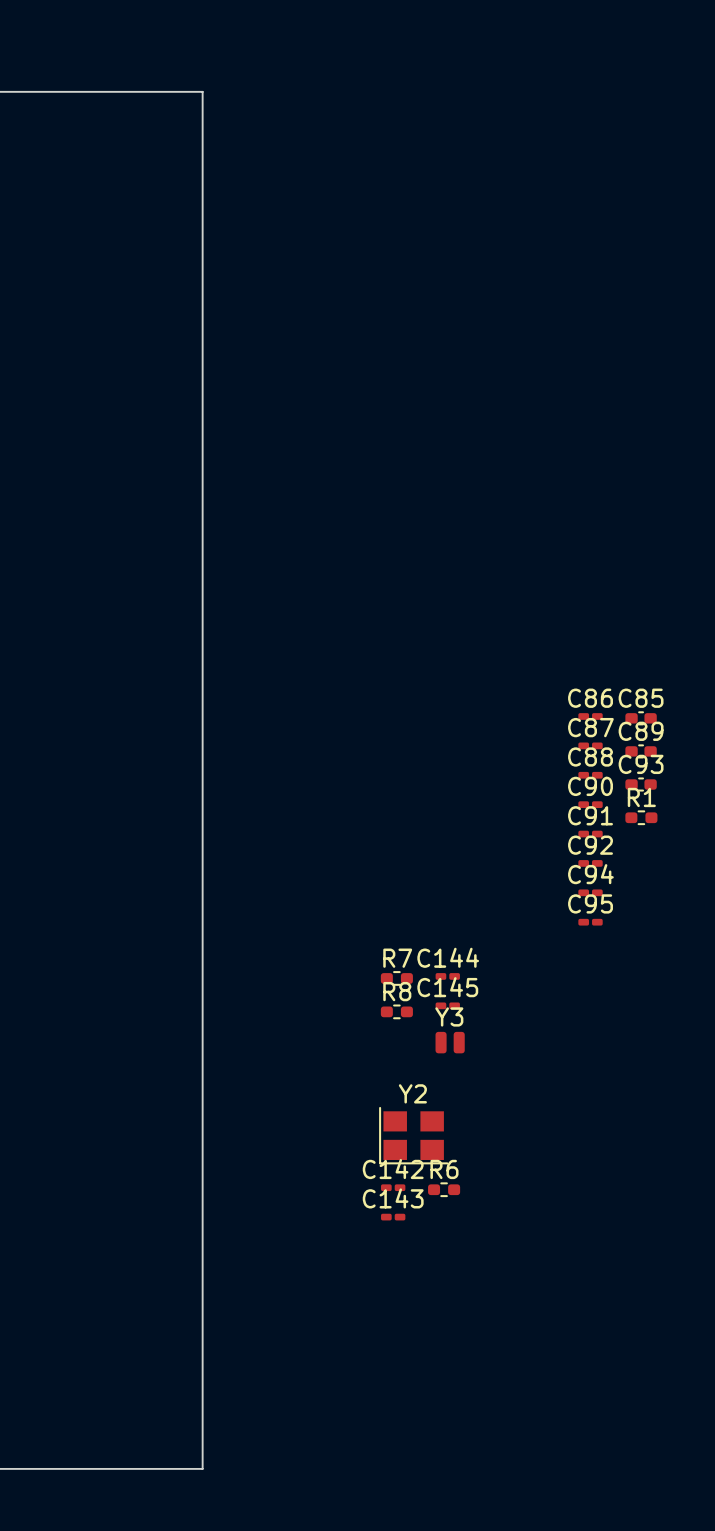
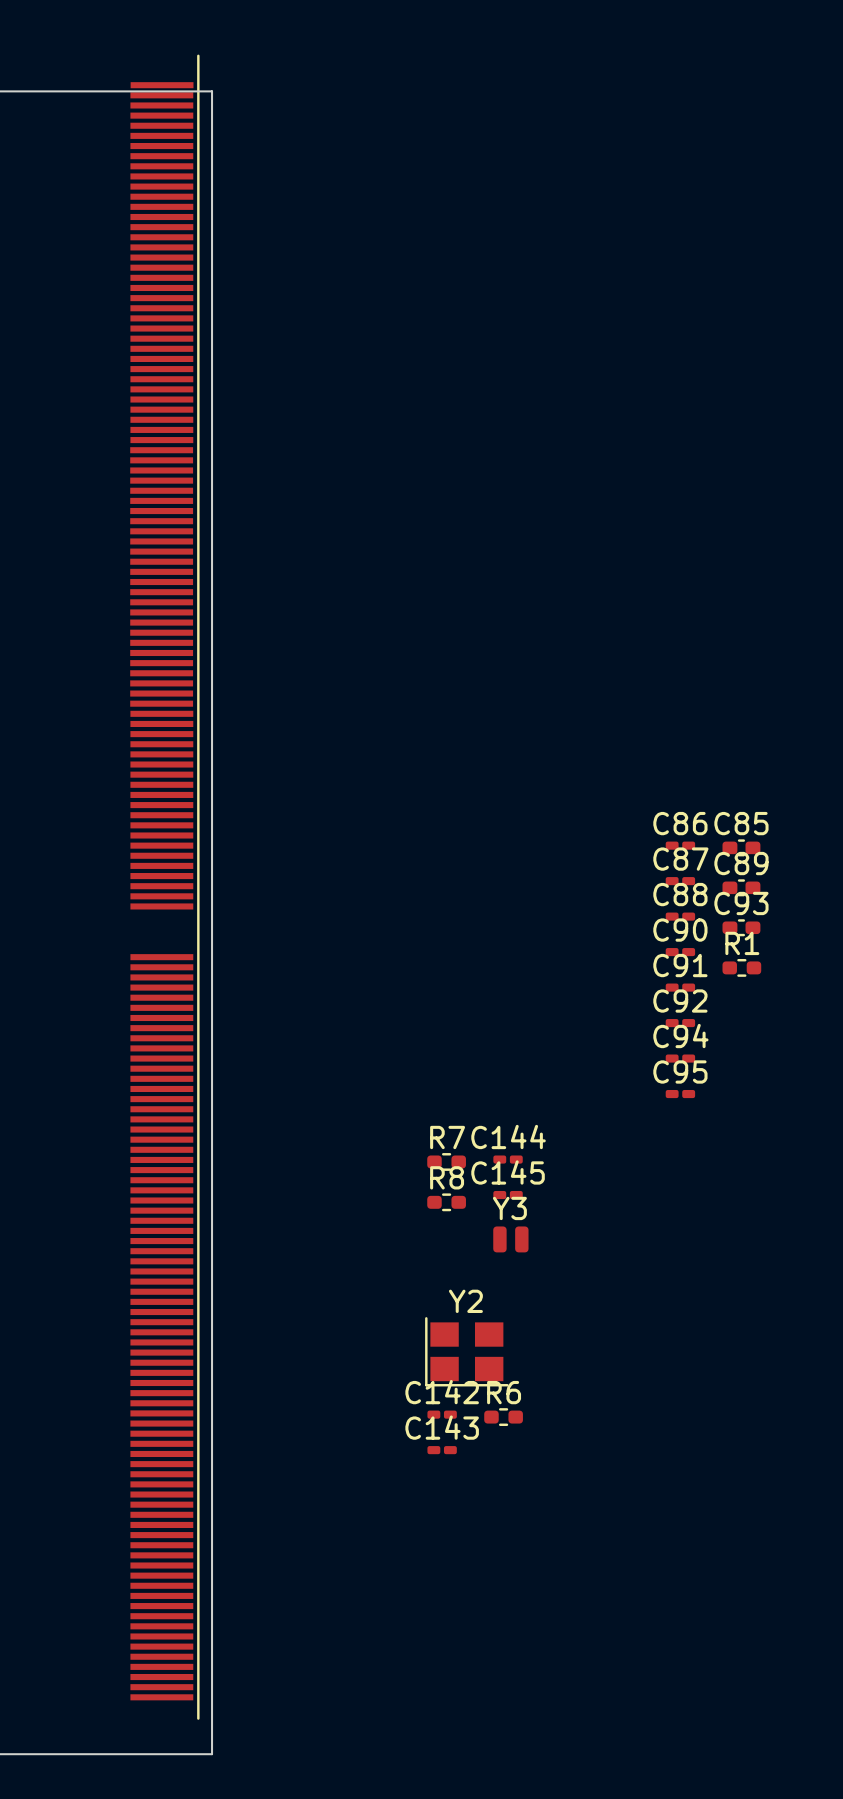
part: none -> (164, 887)

